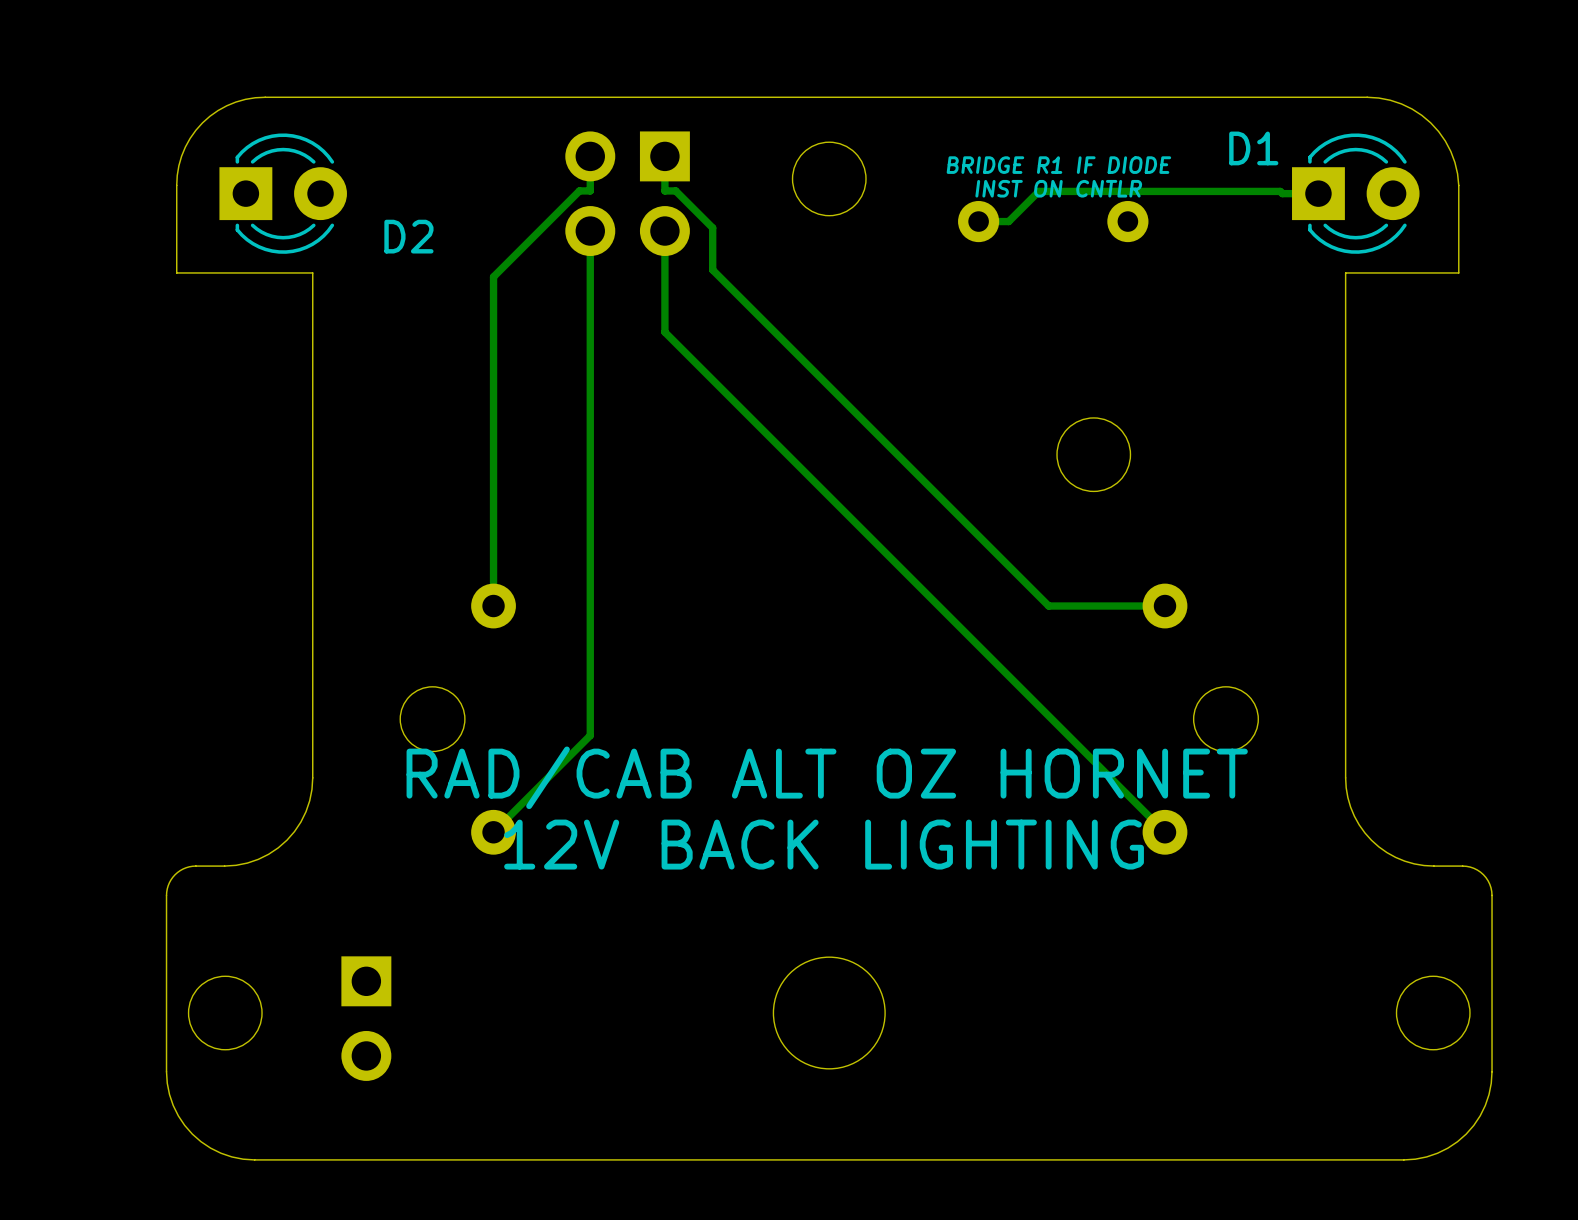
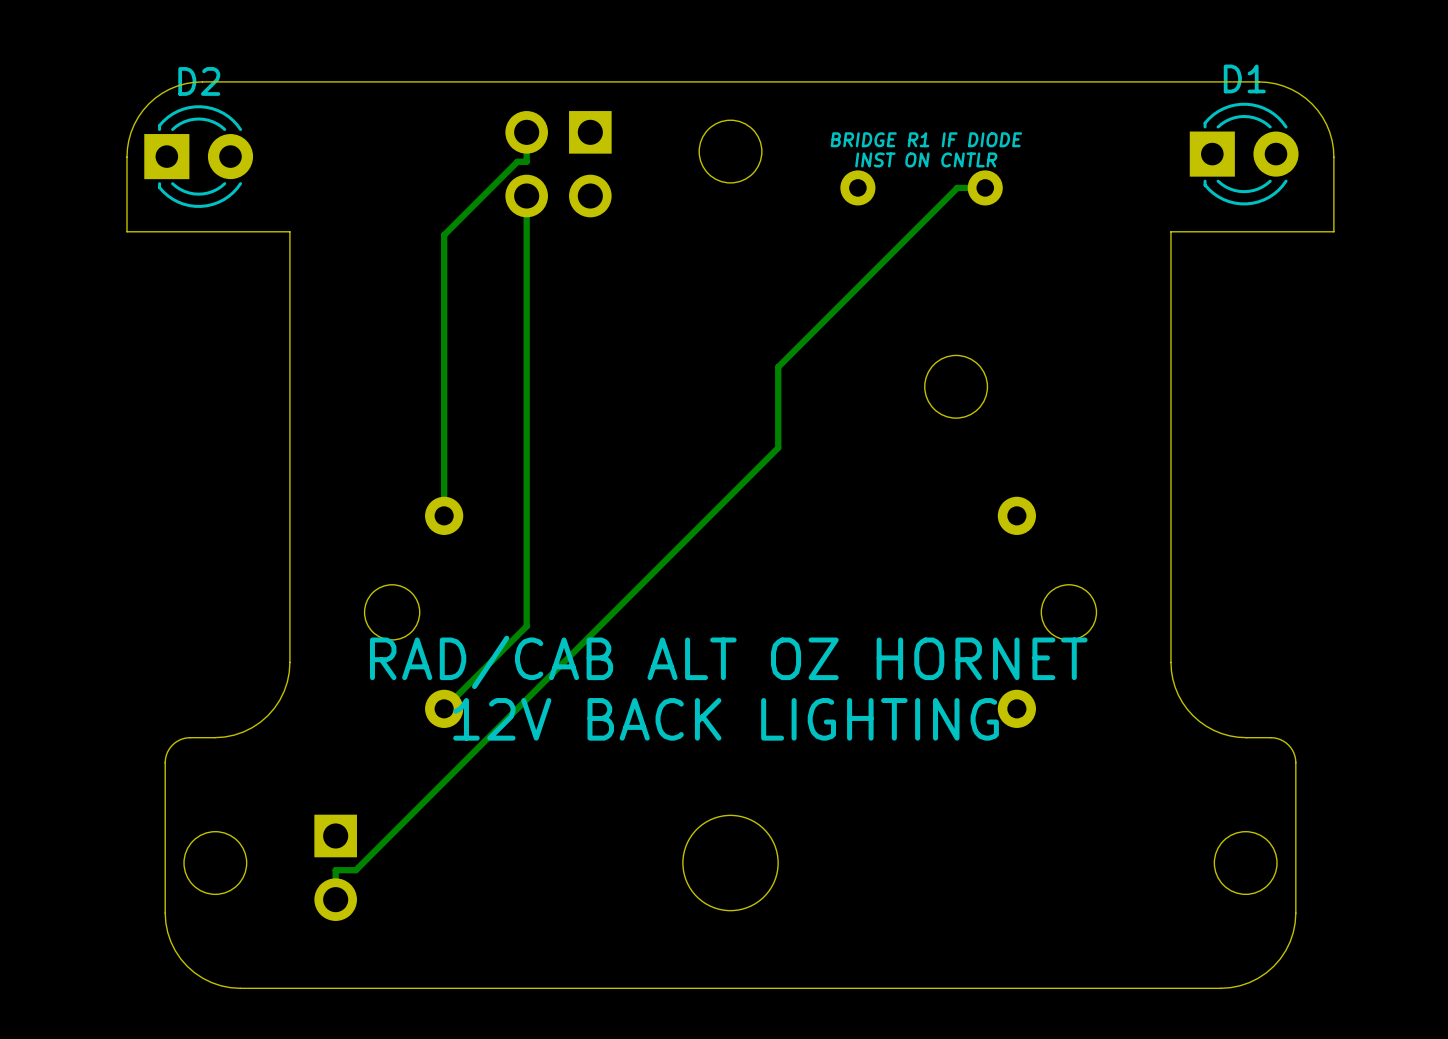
board edge: (265, 97) (235, 102) (218, 110) (202, 122) (185, 147) (177, 175) (176, 272) -> (249, 81) (194, 82) (177, 85) (162, 93) (149, 103) (134, 124) (127, 148) (127, 231) (173, 231)
board edge: (1367, 97) (1390, 100) (1411, 108) (1438, 131) (1450, 151) (1458, 185) (1458, 272) -> (1189, 81) (1258, 81) (1283, 86) (1305, 98) (1317, 110) (1326, 124) (1333, 148) (1333, 231) (1267, 231)
D1 name position: D1 (1253, 148) -> D1 (1244, 78)
track: (664, 156) (664, 190) (675, 190) (712, 227) (712, 269) (1048, 606) (1165, 606) -> none
D2 position: (283, 193) -> (198, 156)
track: (1318, 193) (1282, 193) (1280, 191) (1038, 191) (1008, 221) (978, 221) -> none
D1 position: (1355, 193) -> (1244, 154)
track: none -> (985, 187) (957, 187) (778, 367) (778, 447) (355, 870) (335, 870) (335, 899)
track: (664, 231) (664, 332) (1165, 832) -> none
D2 name position: D2 (408, 236) -> D2 (199, 81)

